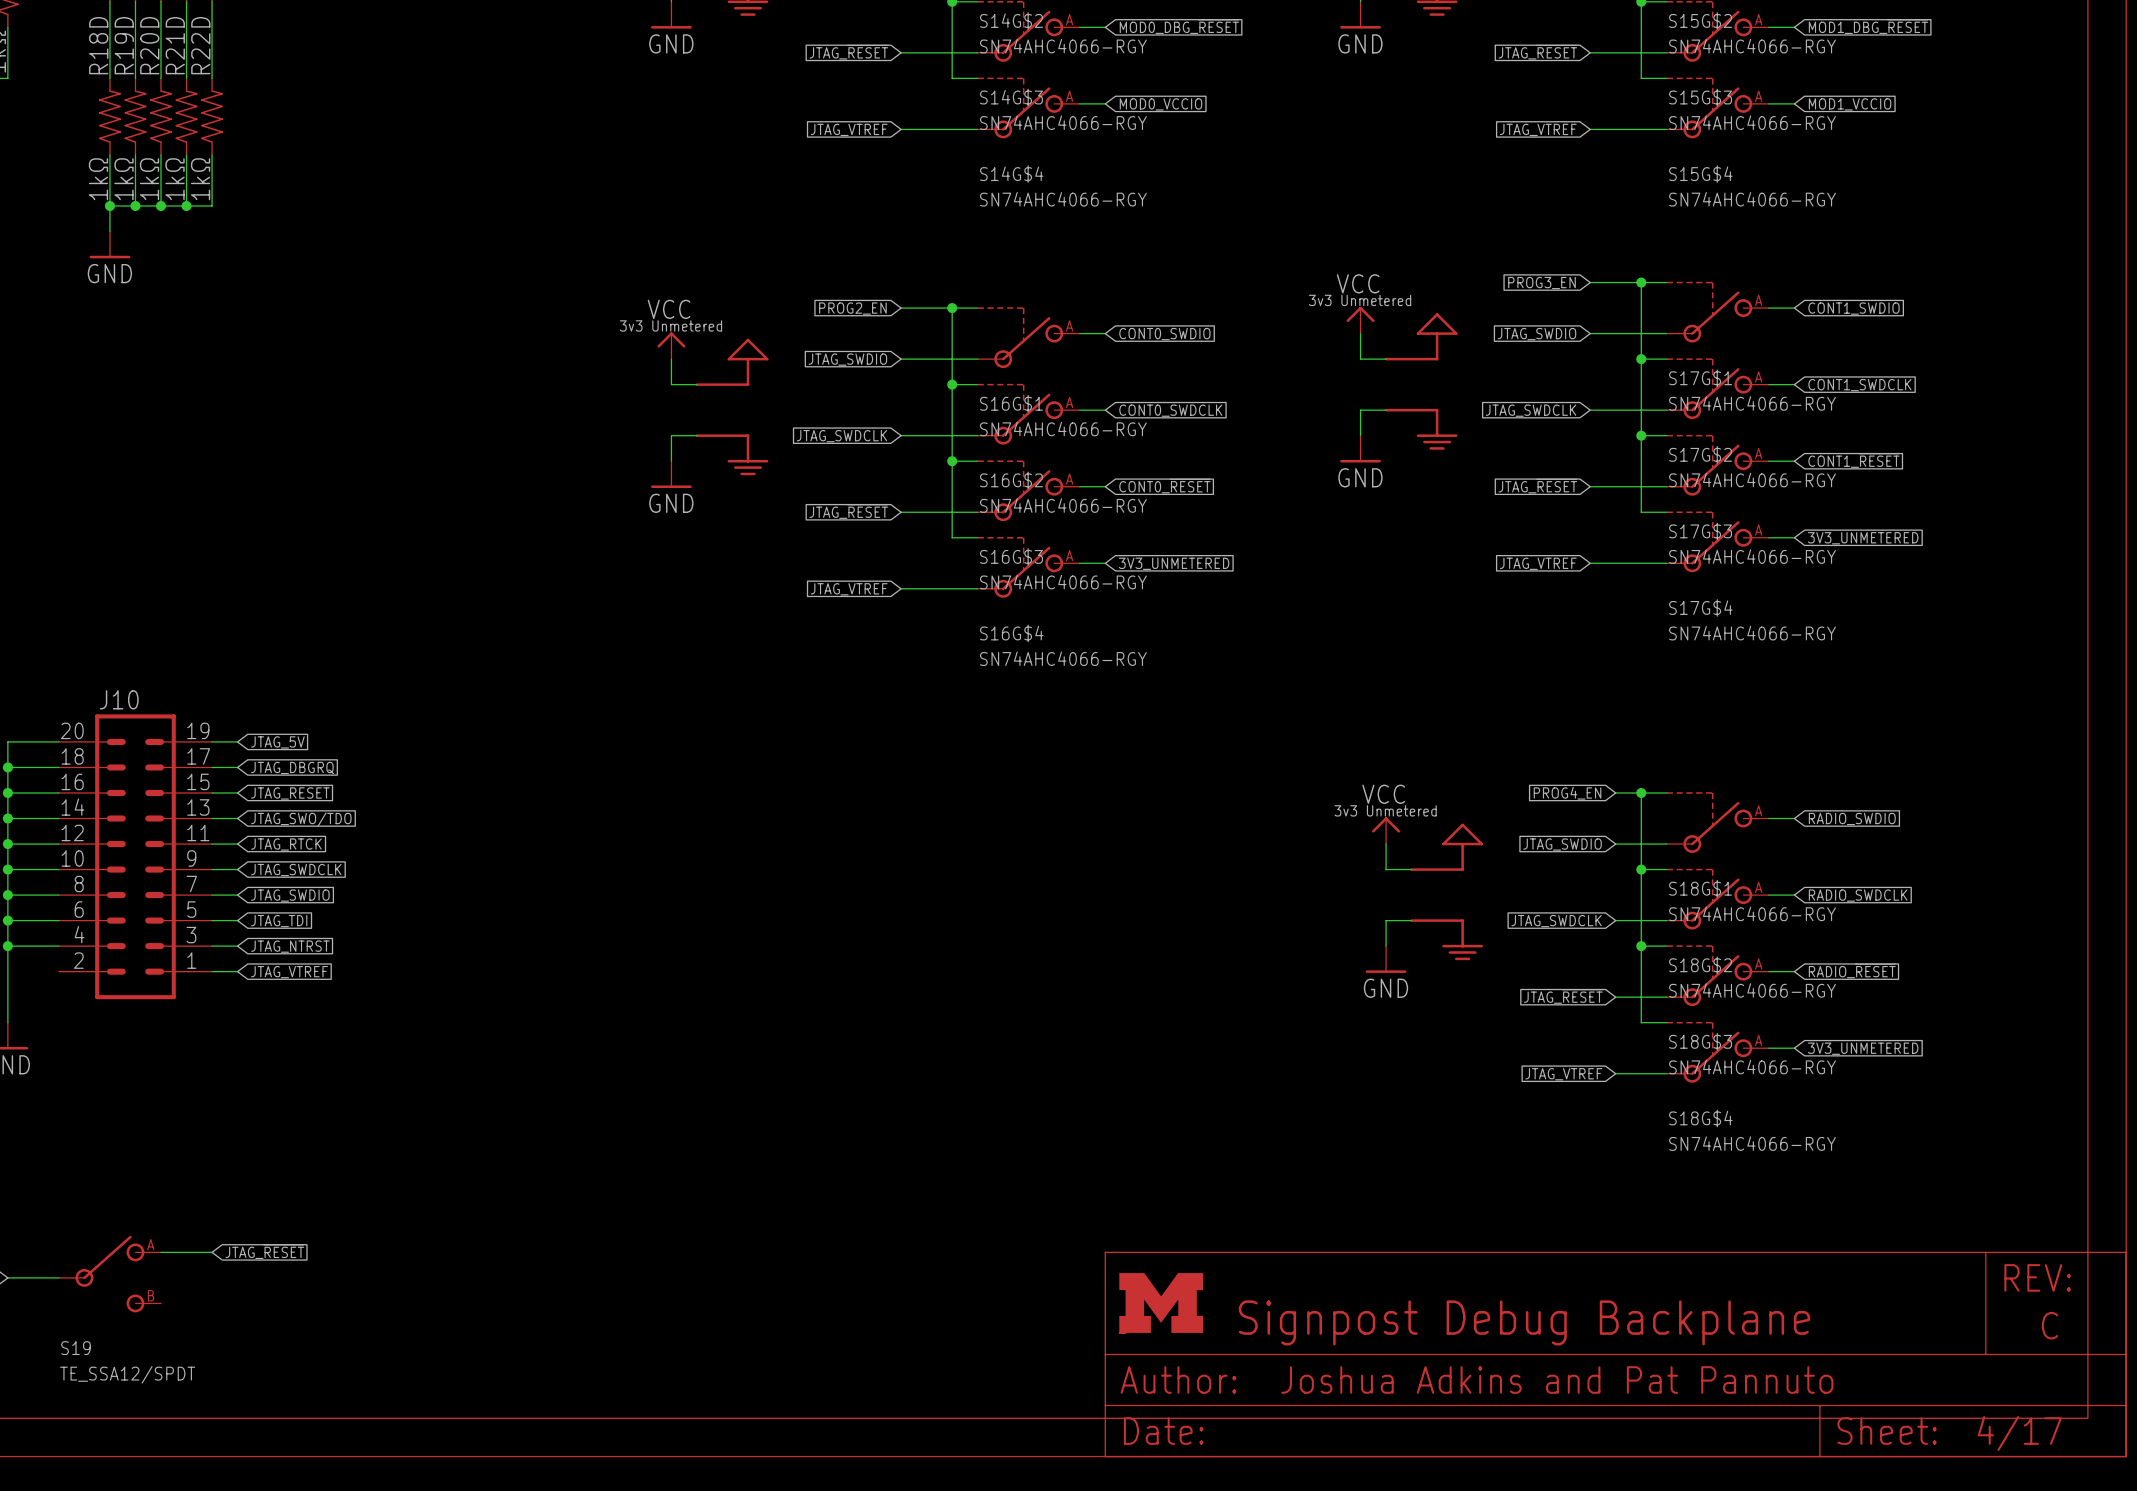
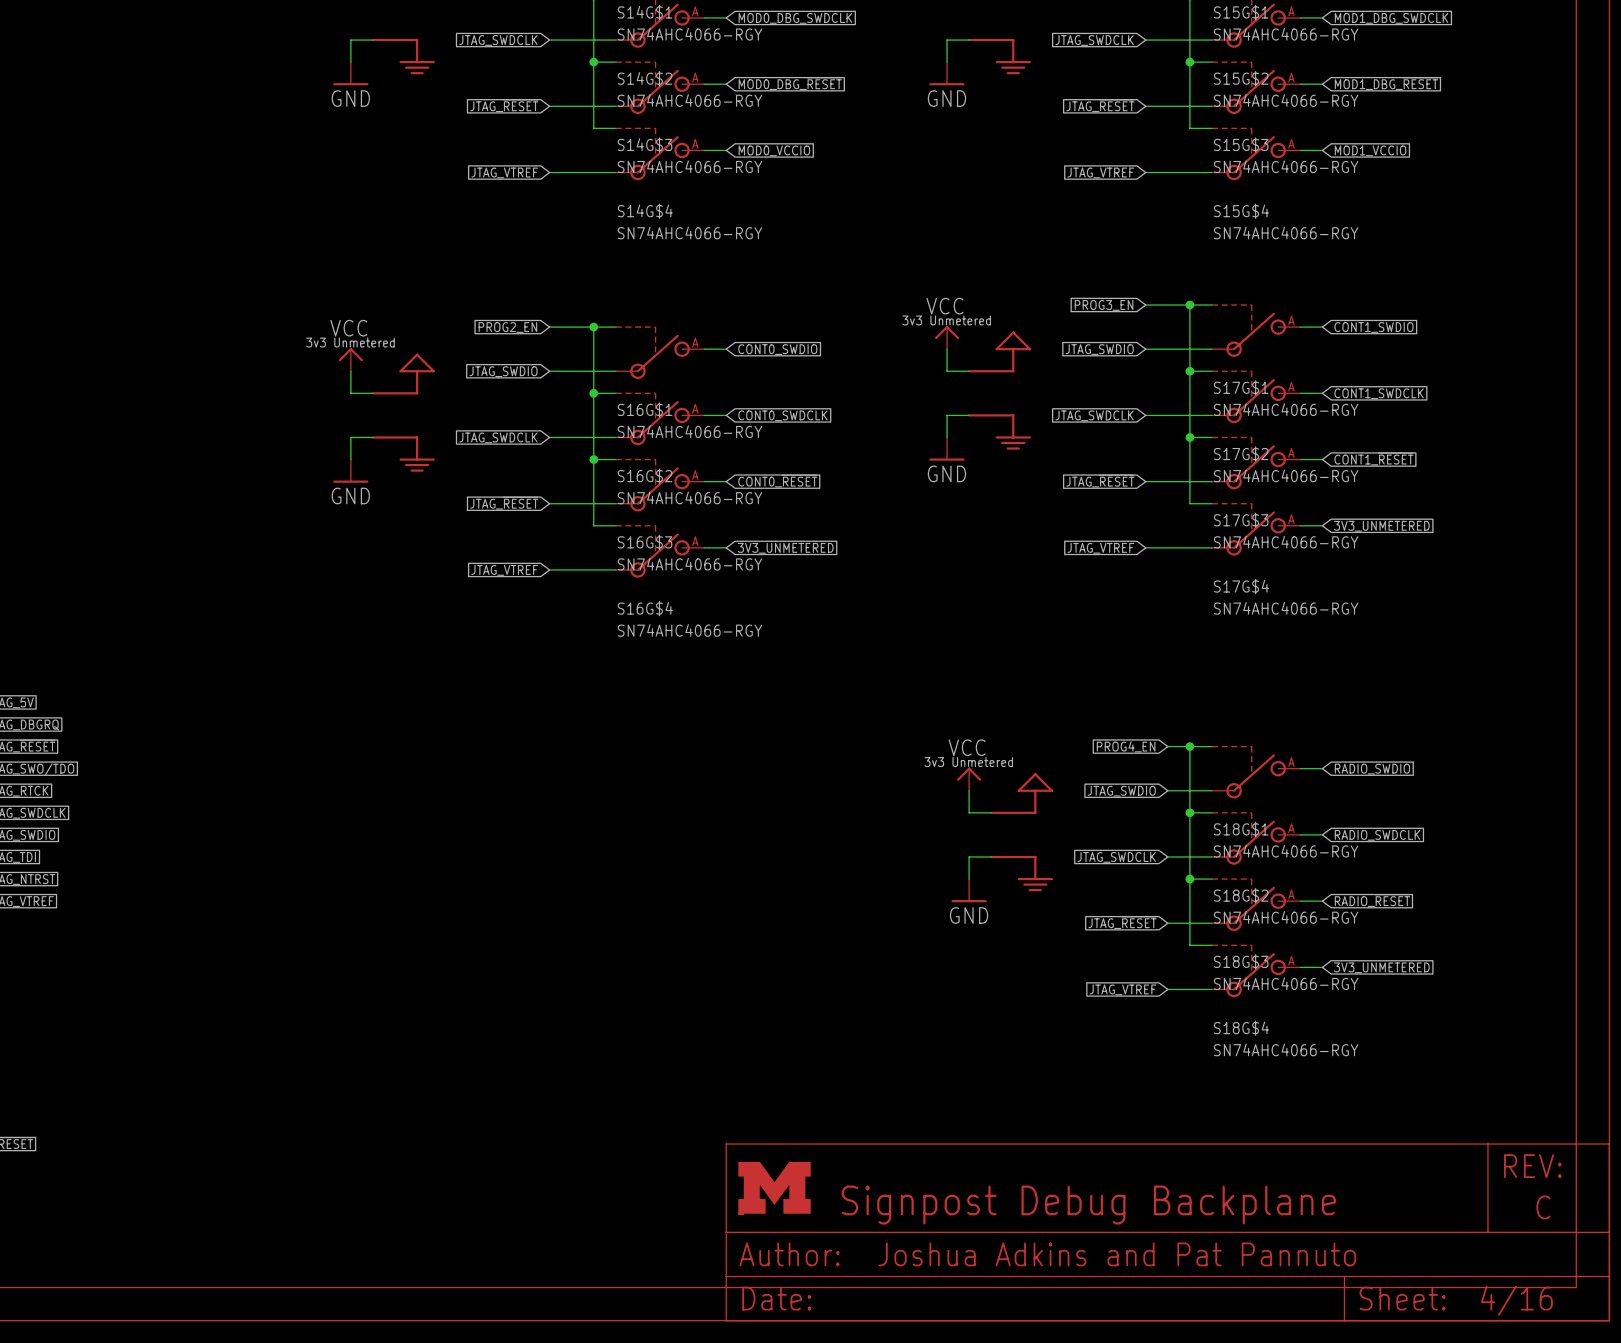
part text: 4/17 (2019, 1433) -> 4/16 (1516, 1300)

